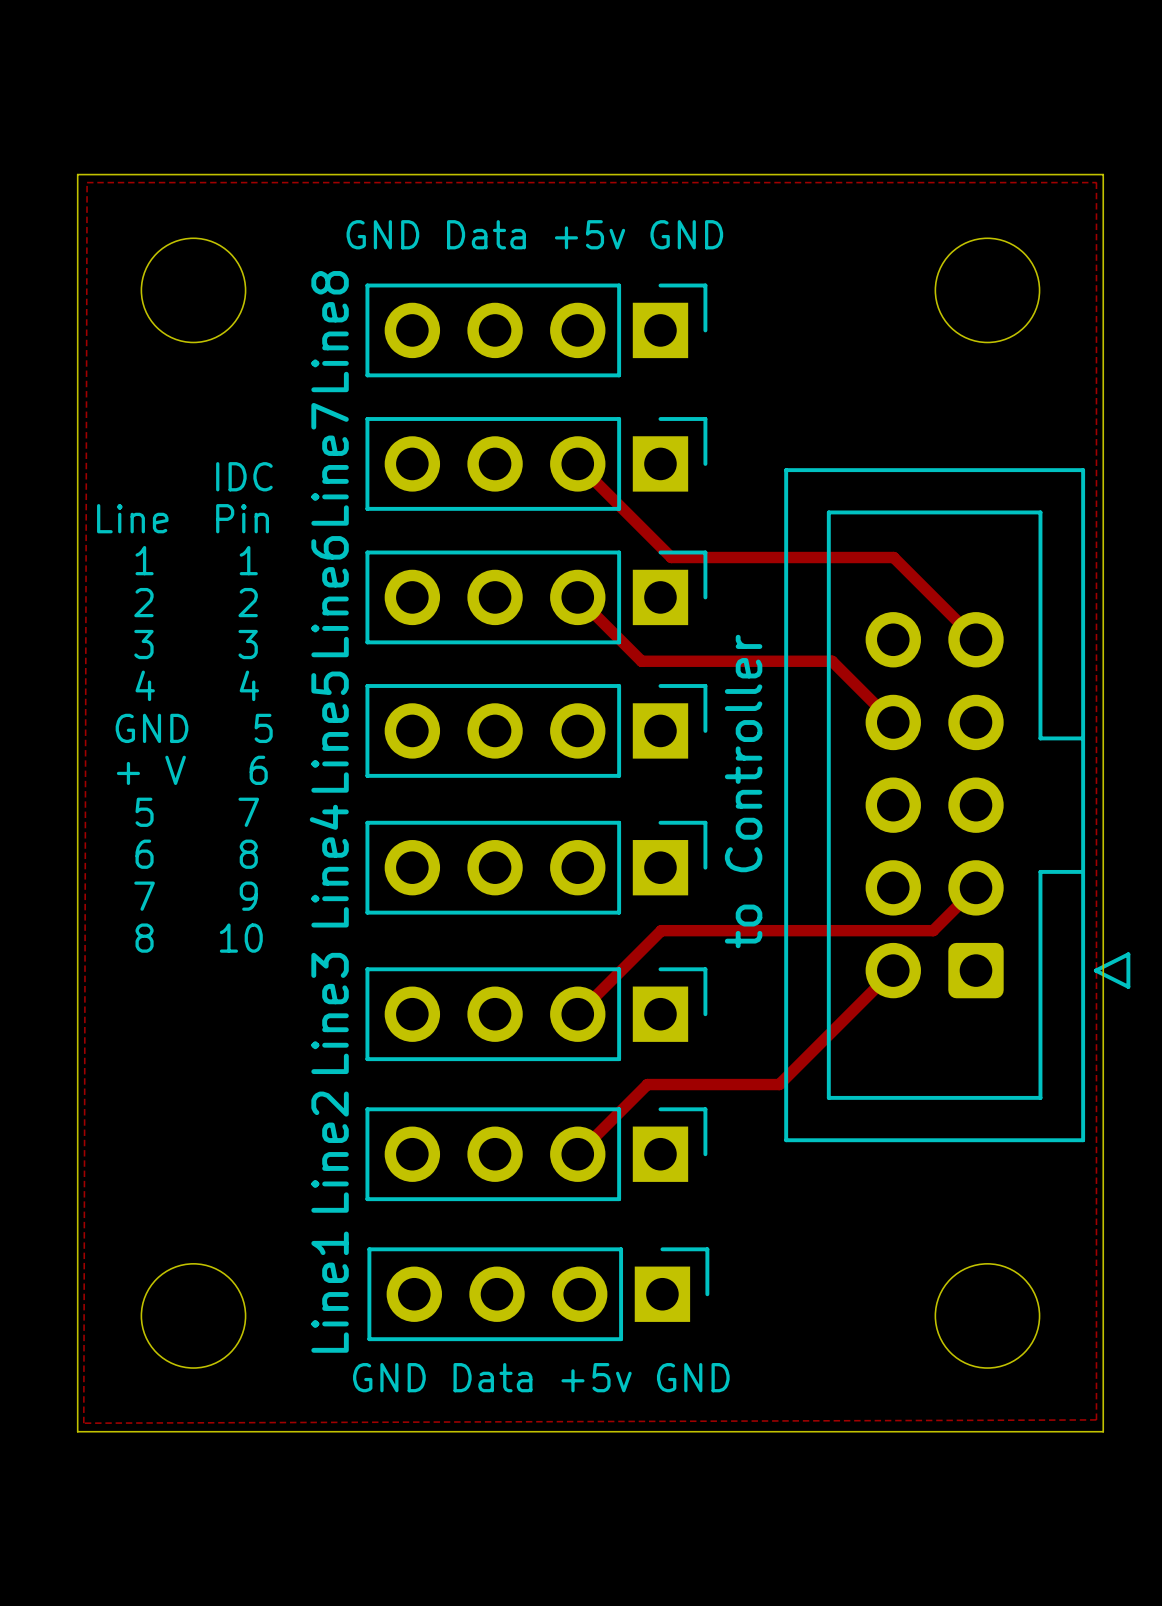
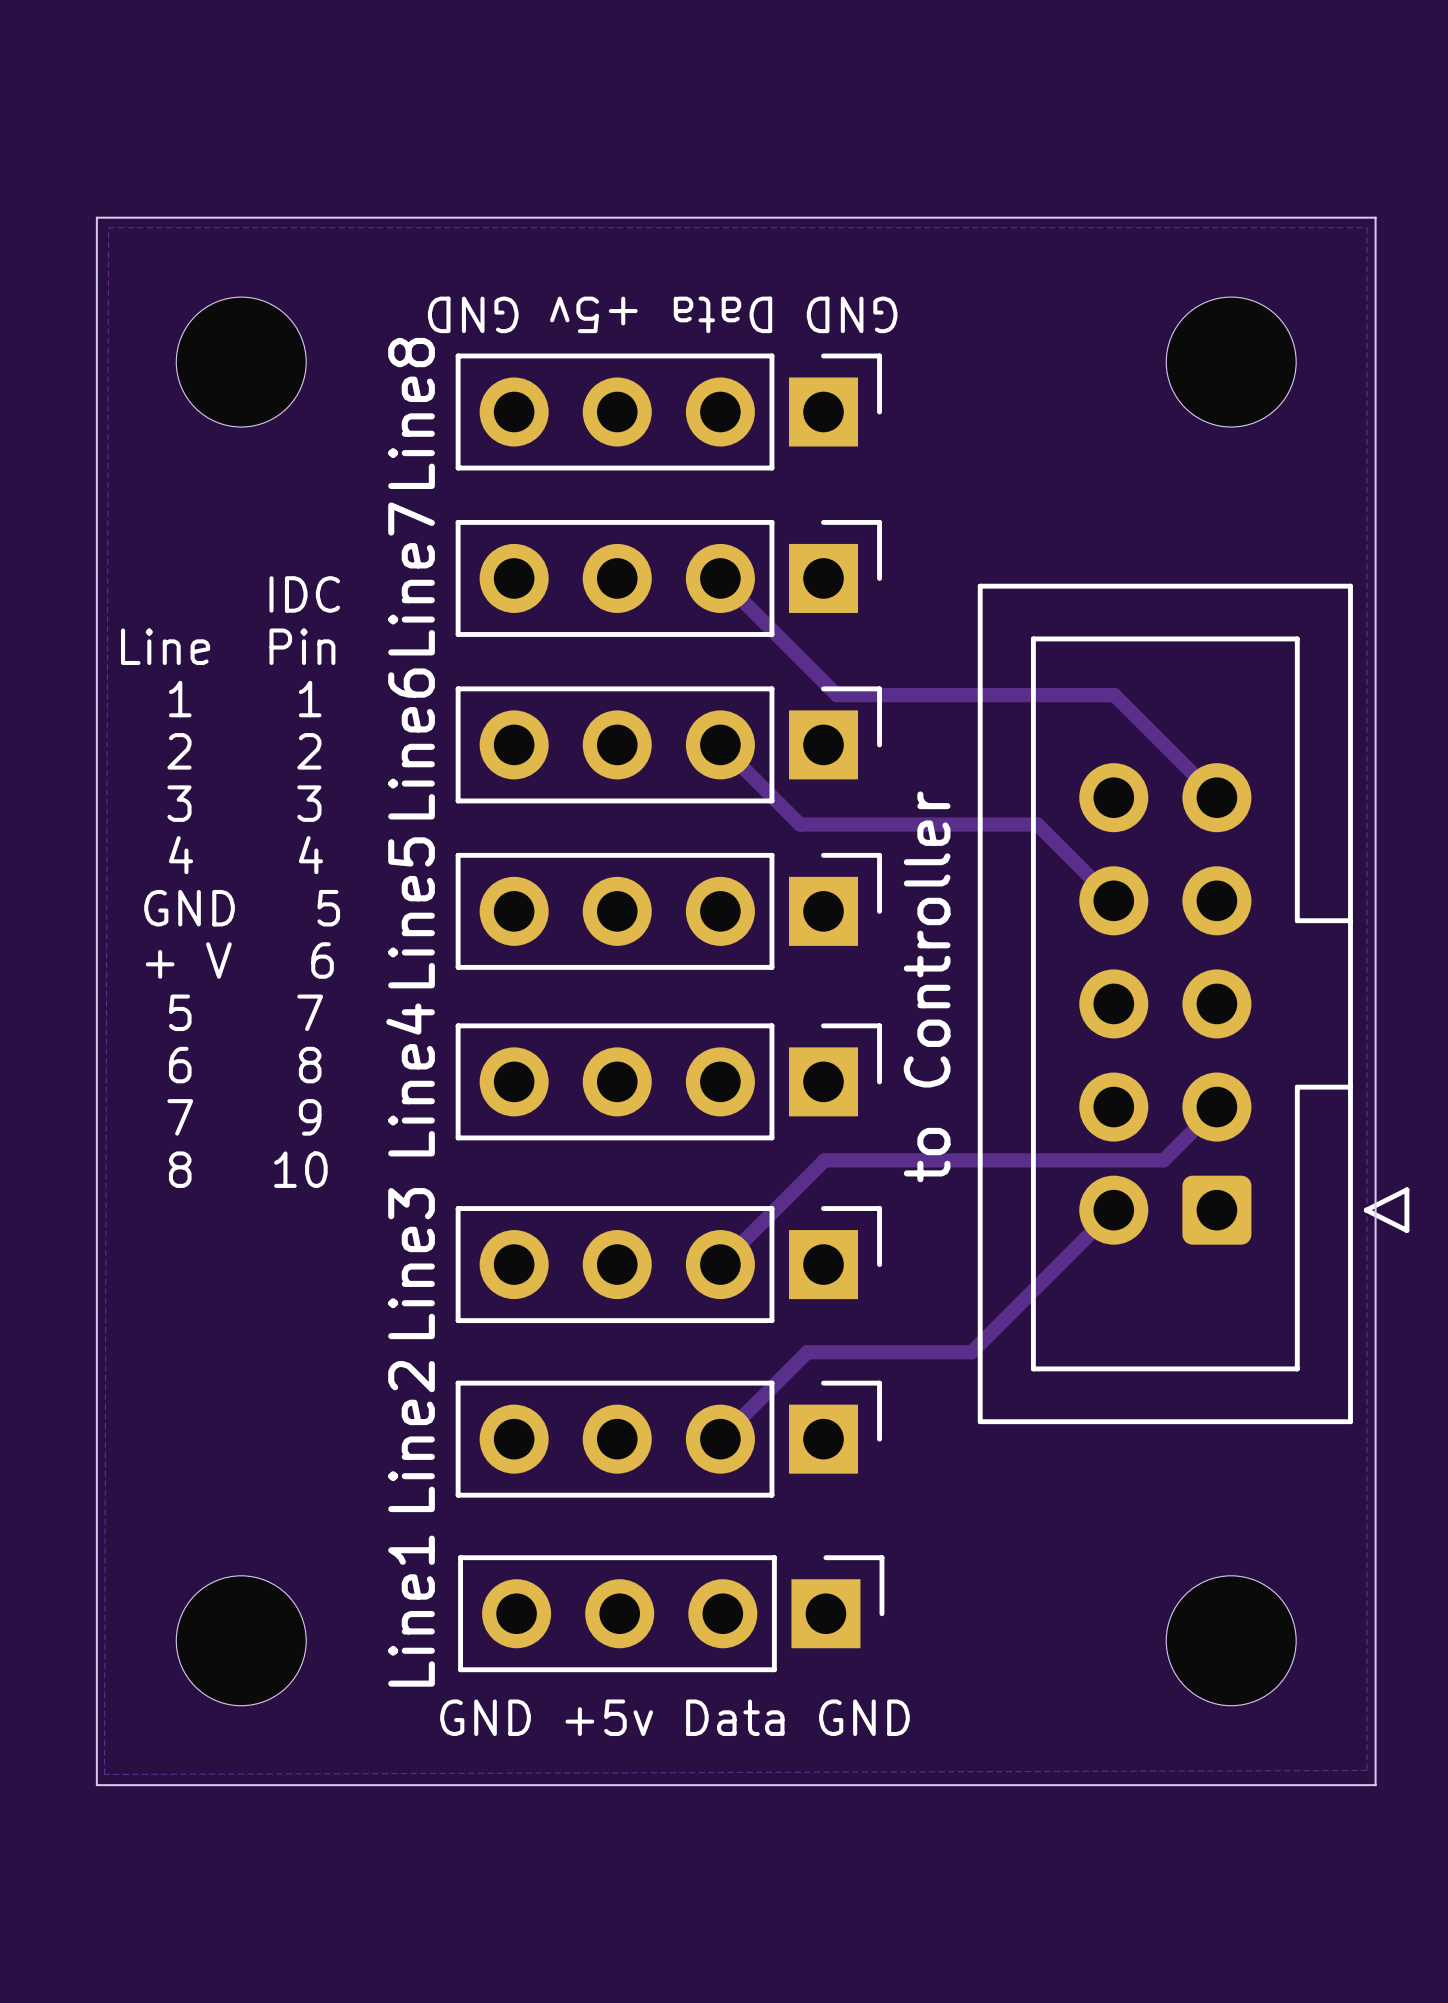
text rotation: 0° (534, 234) -> 180° (662, 314)
text: GND Data +5v GND (541, 1377) -> GND +5v Data GND (674, 1717)

